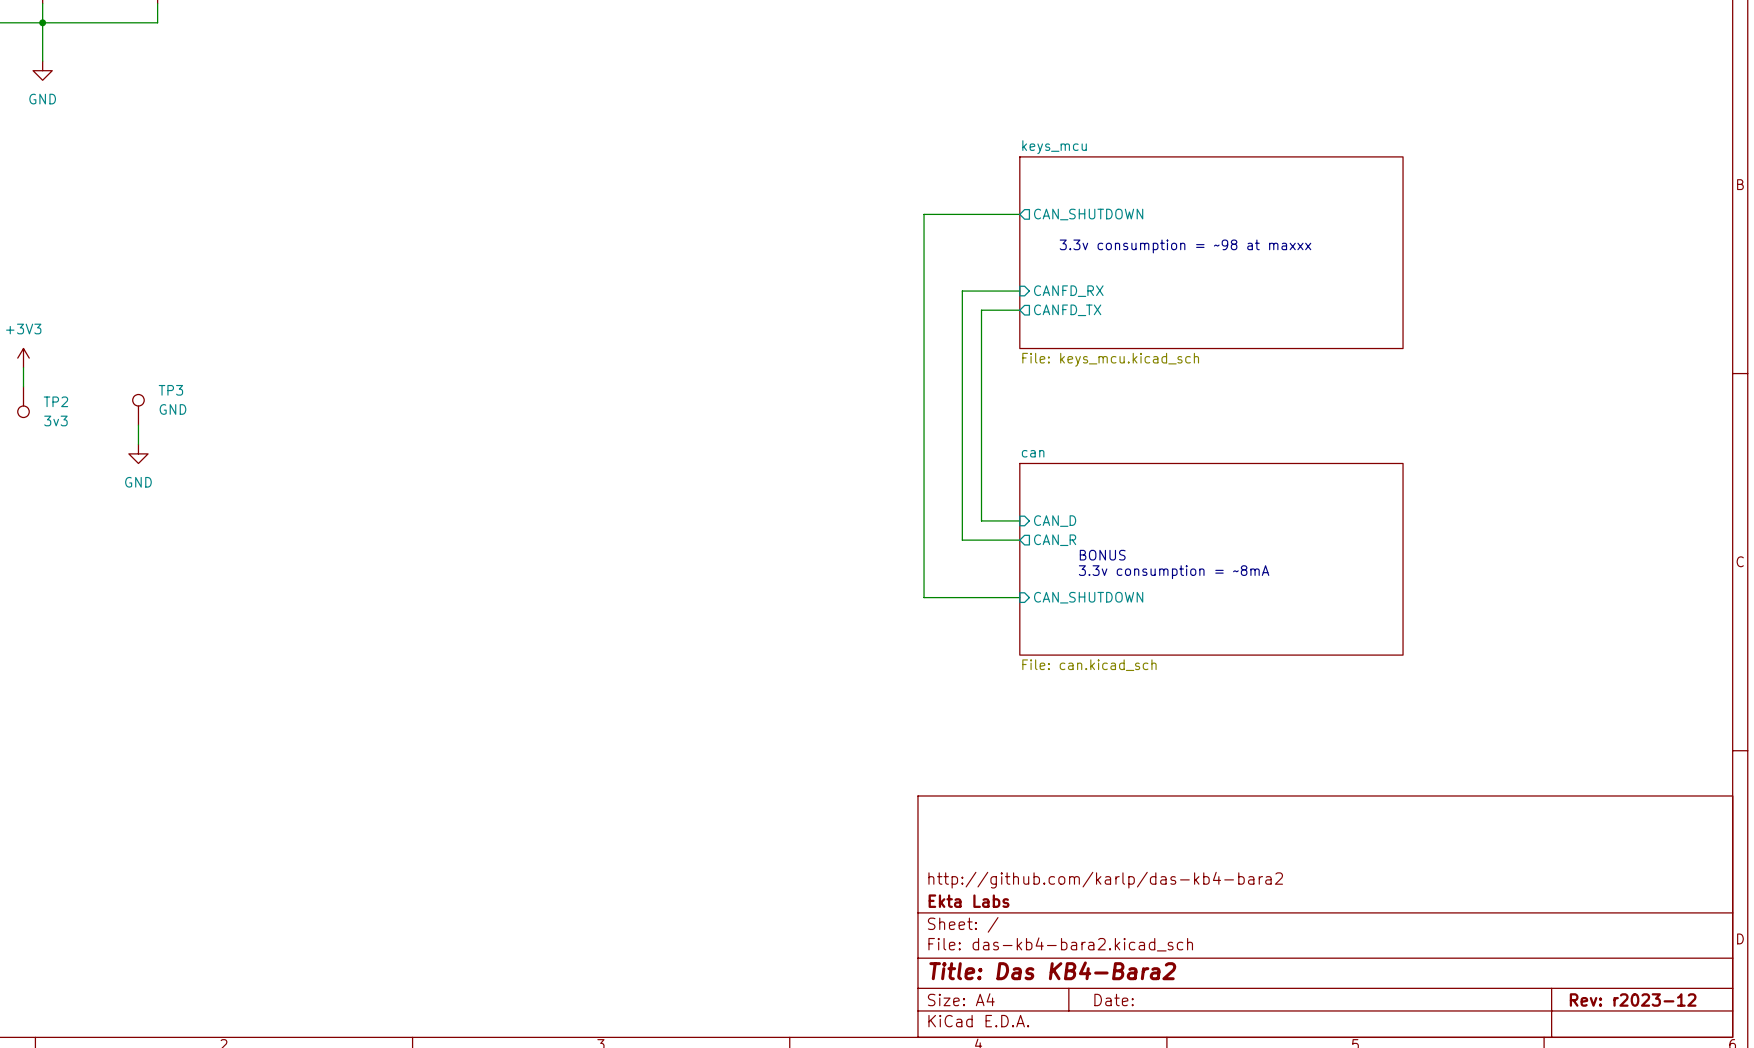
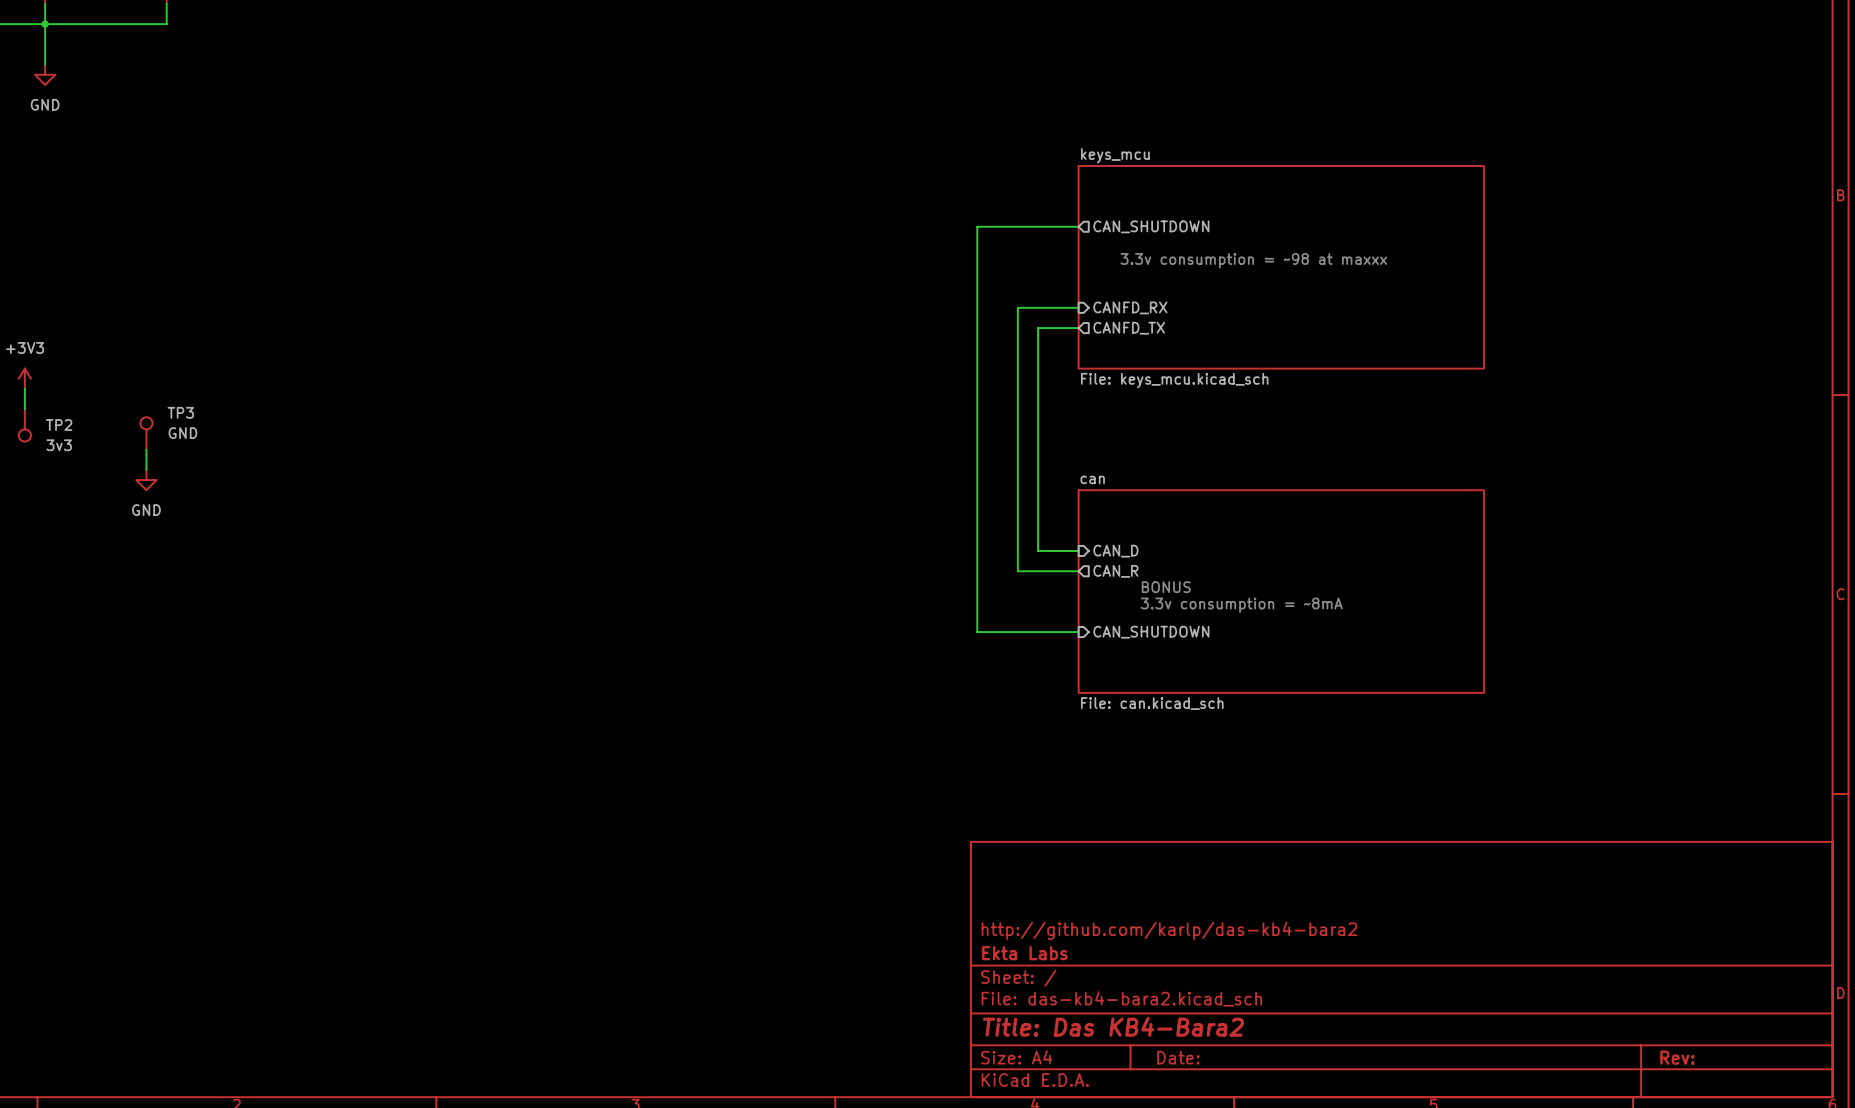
title block: Rev: r2023-12 (1633, 999) -> Rev: (1677, 1057)

